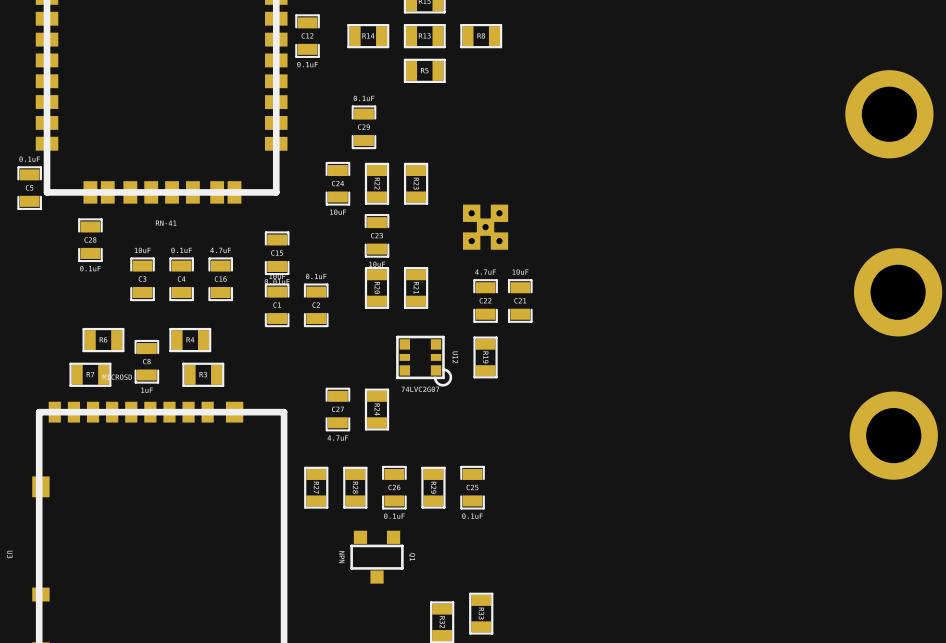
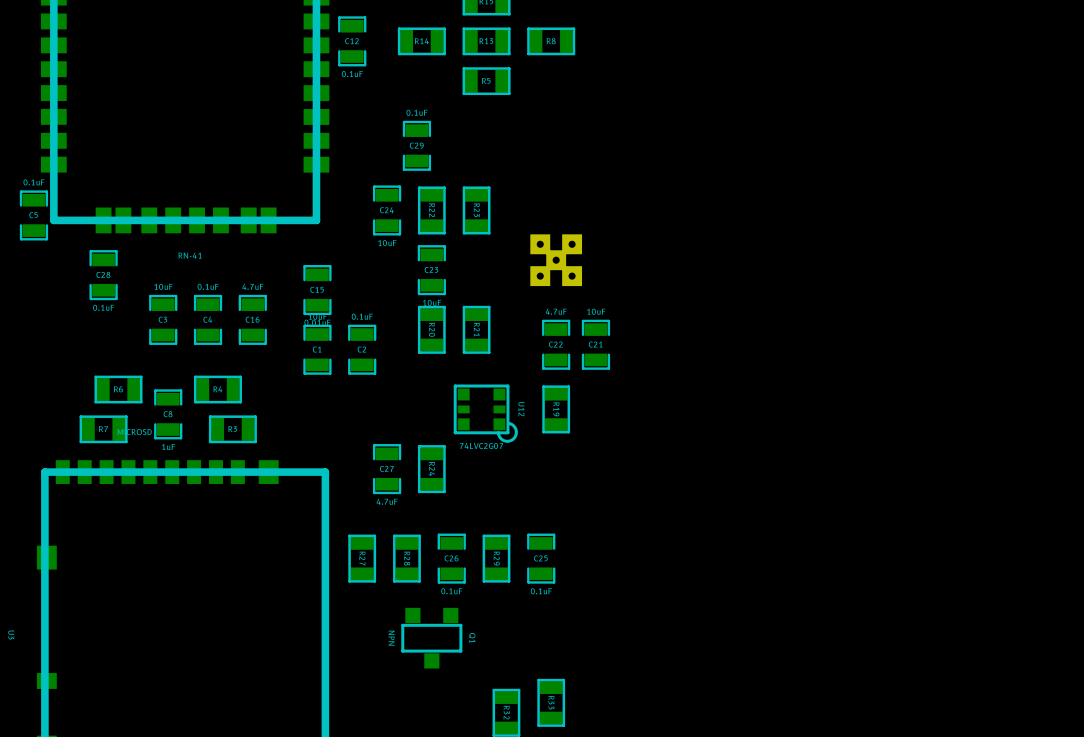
part: (889, 114) -> none
part: (898, 292) -> none
part: (893, 435) -> none

